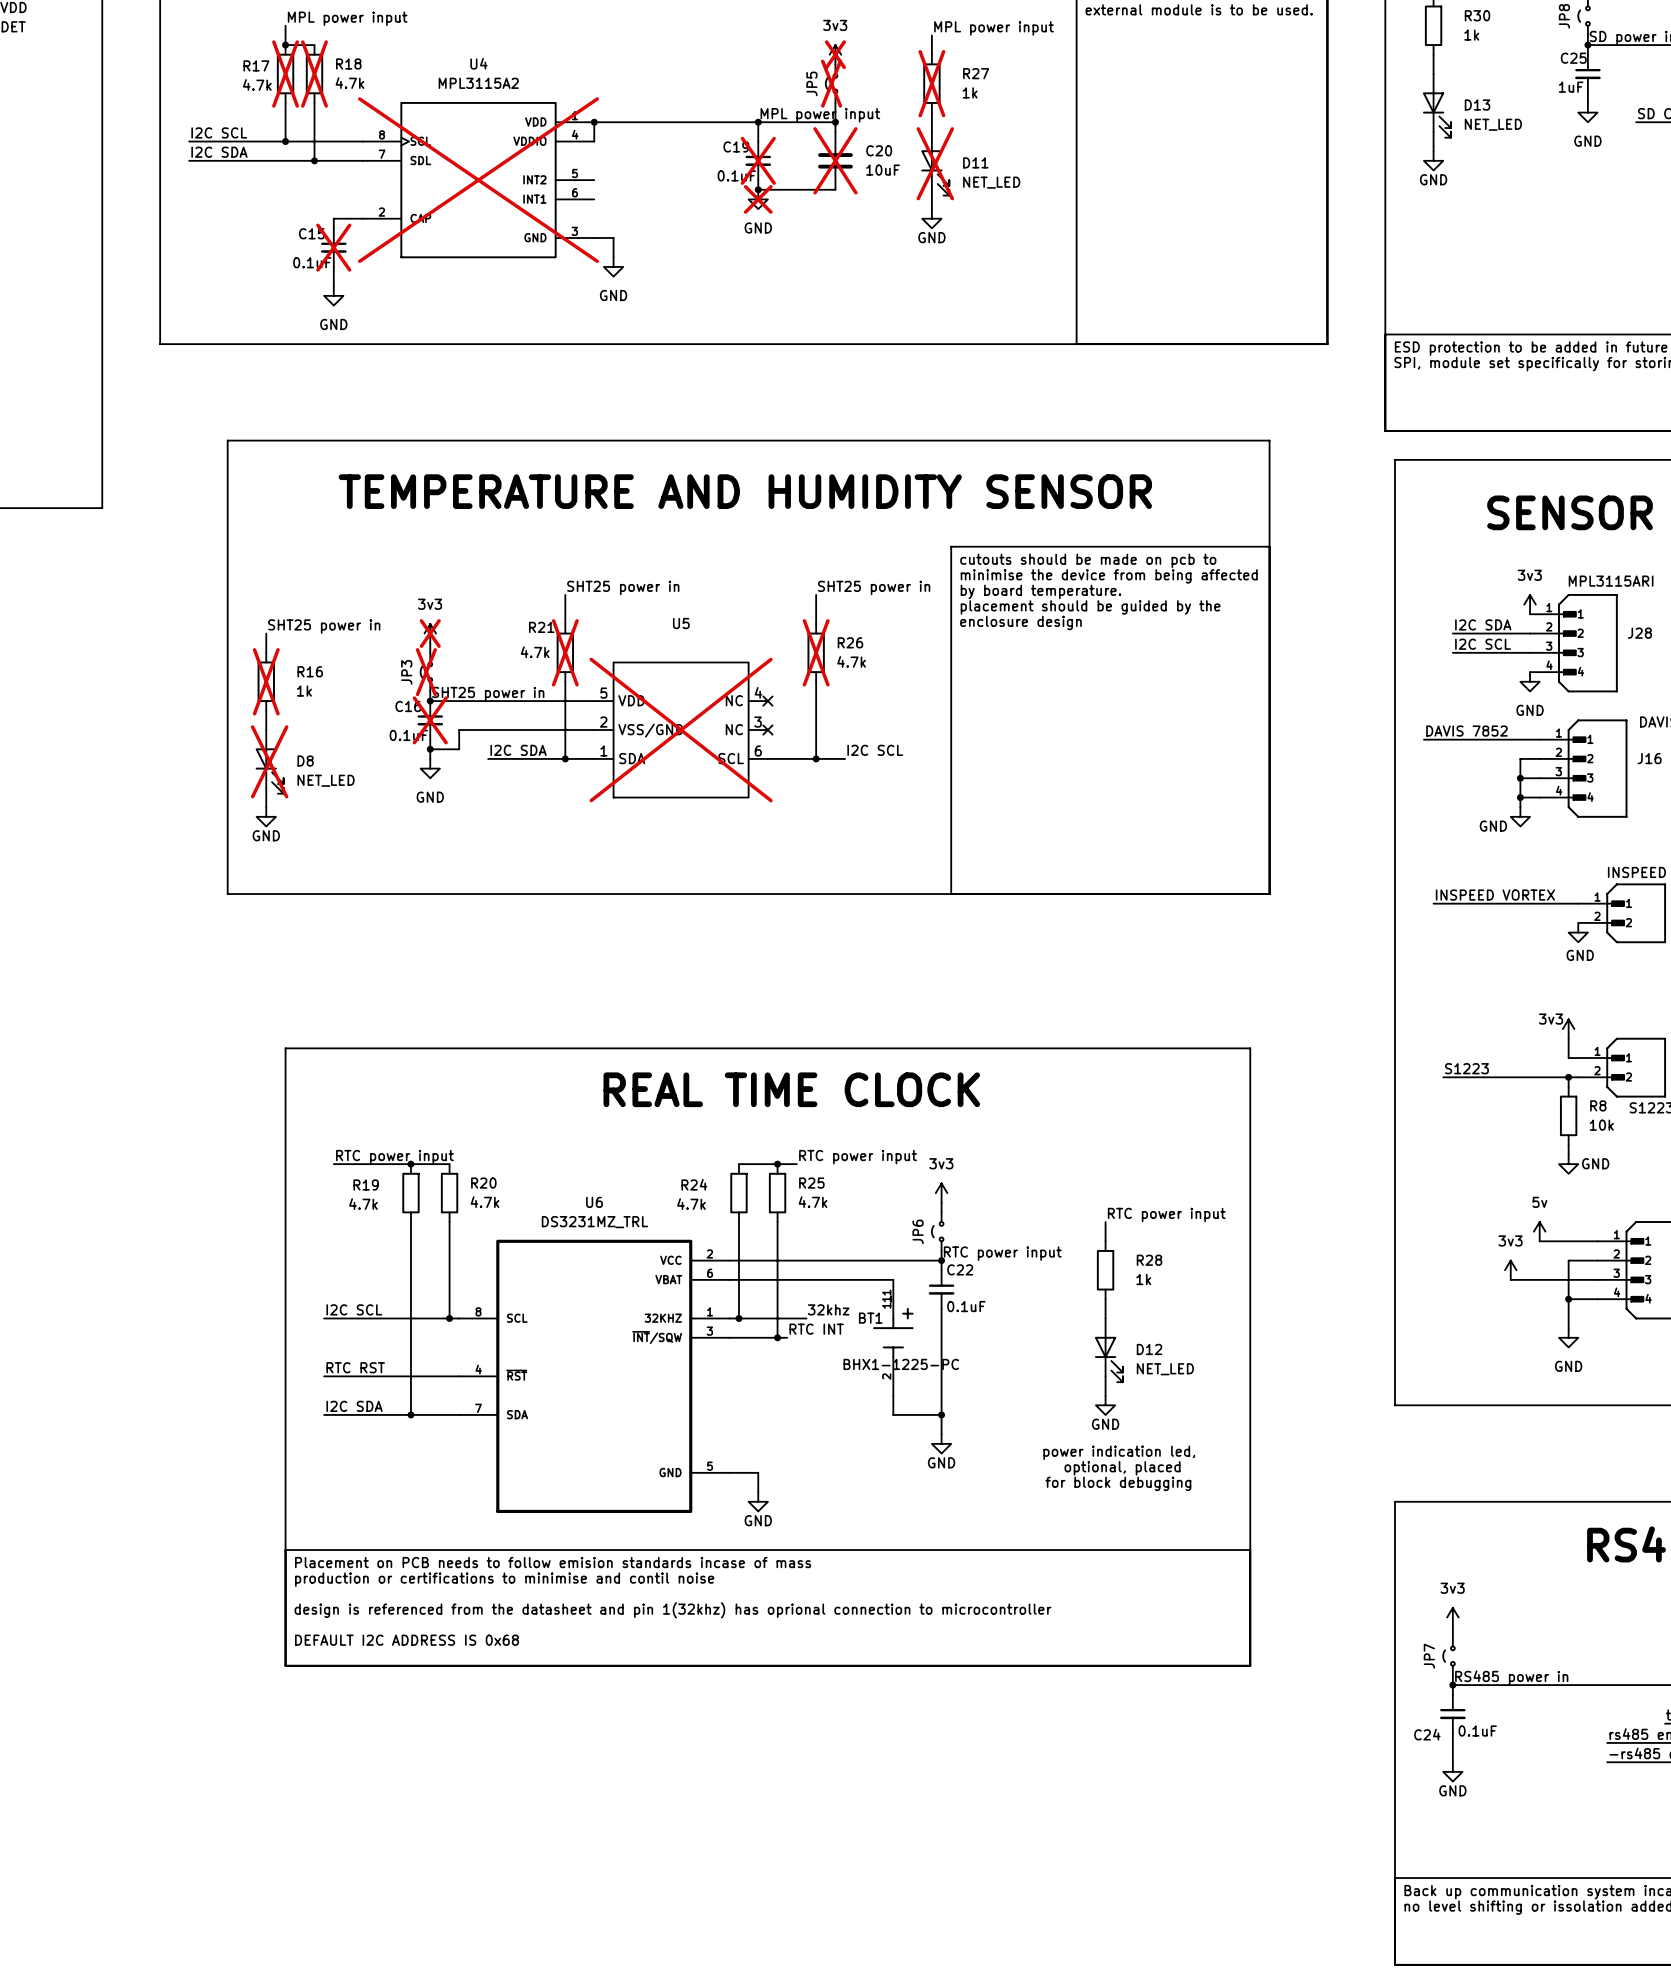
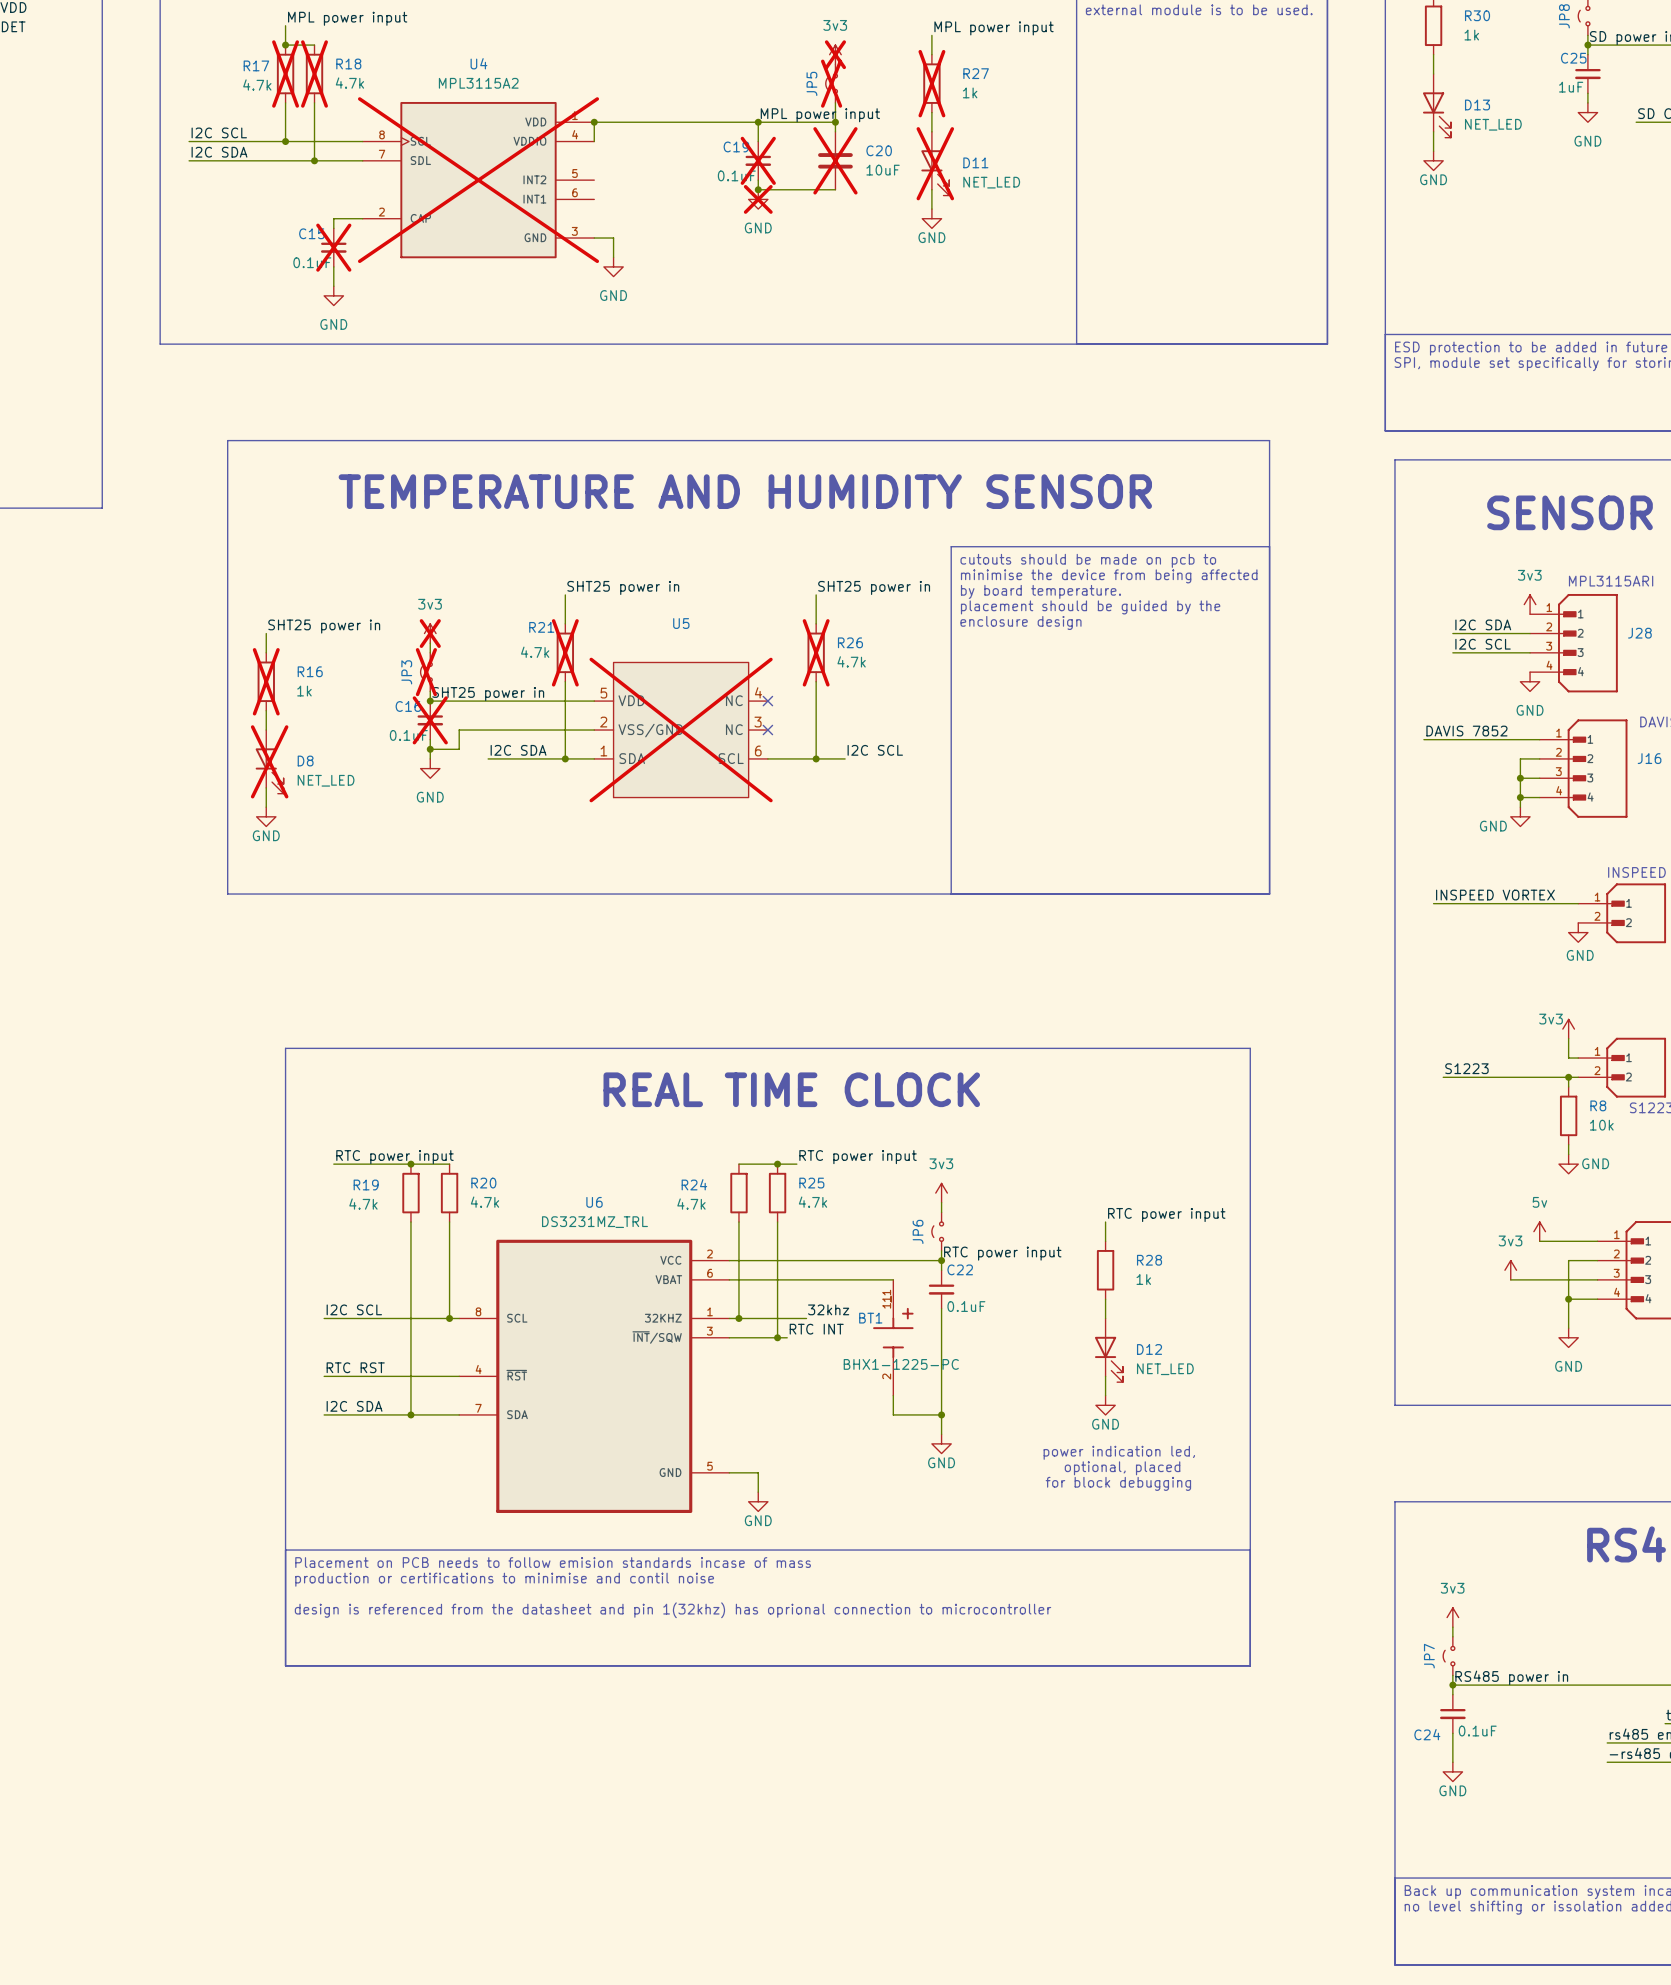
text: DEFAULT I2C ADDRESS IS 0x68 (407, 1640) -> none

